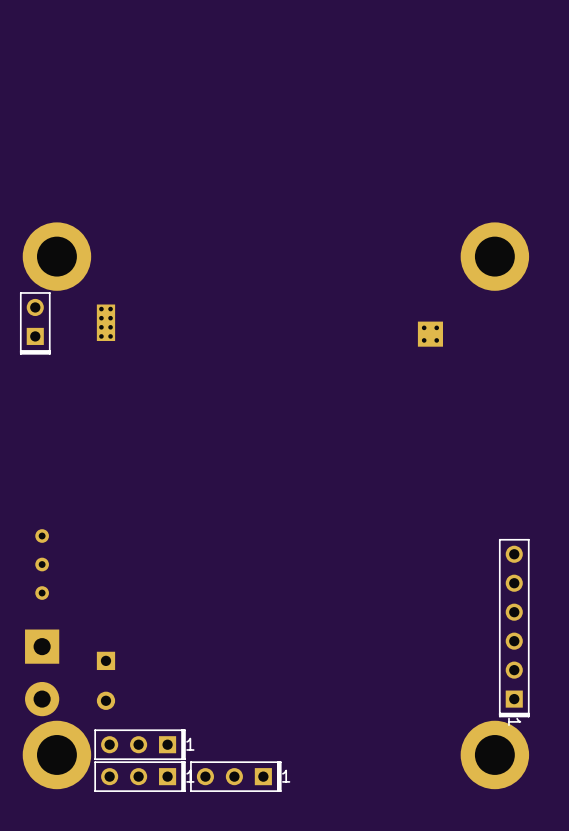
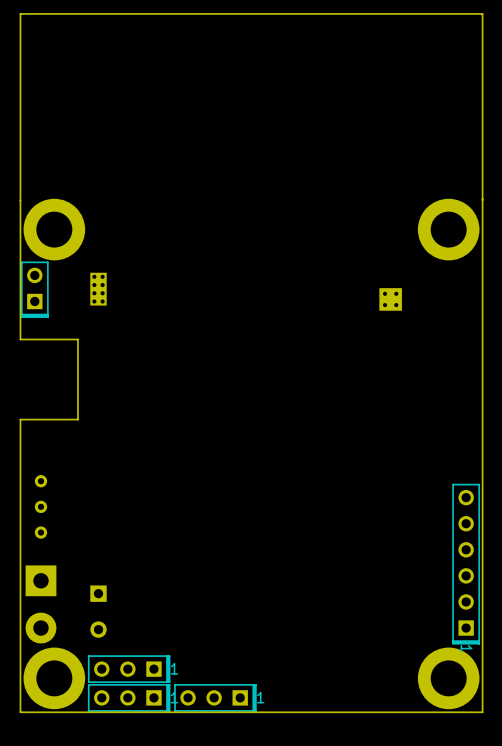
board edge: none -> (482, 13) (20, 13) (20, 339) (77, 339) (77, 419) (20, 419) (20, 712) (482, 712) (482, 13)

